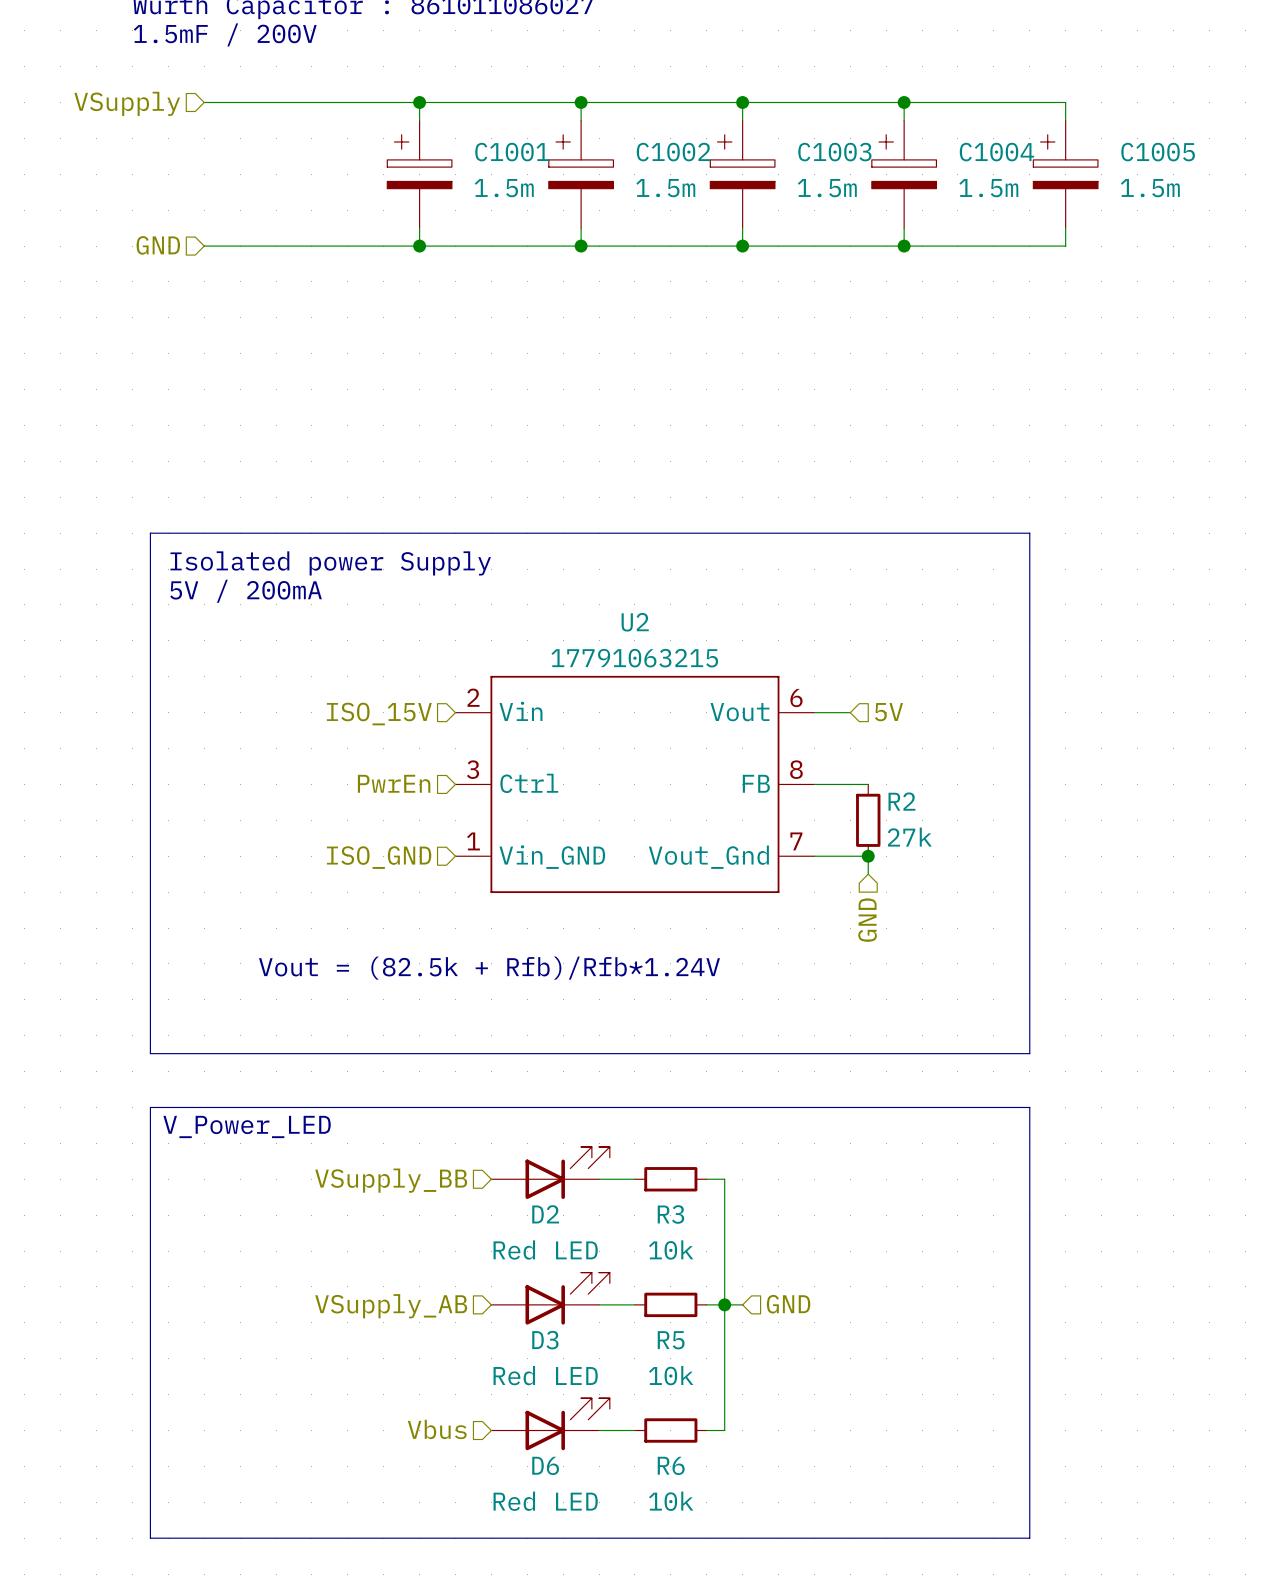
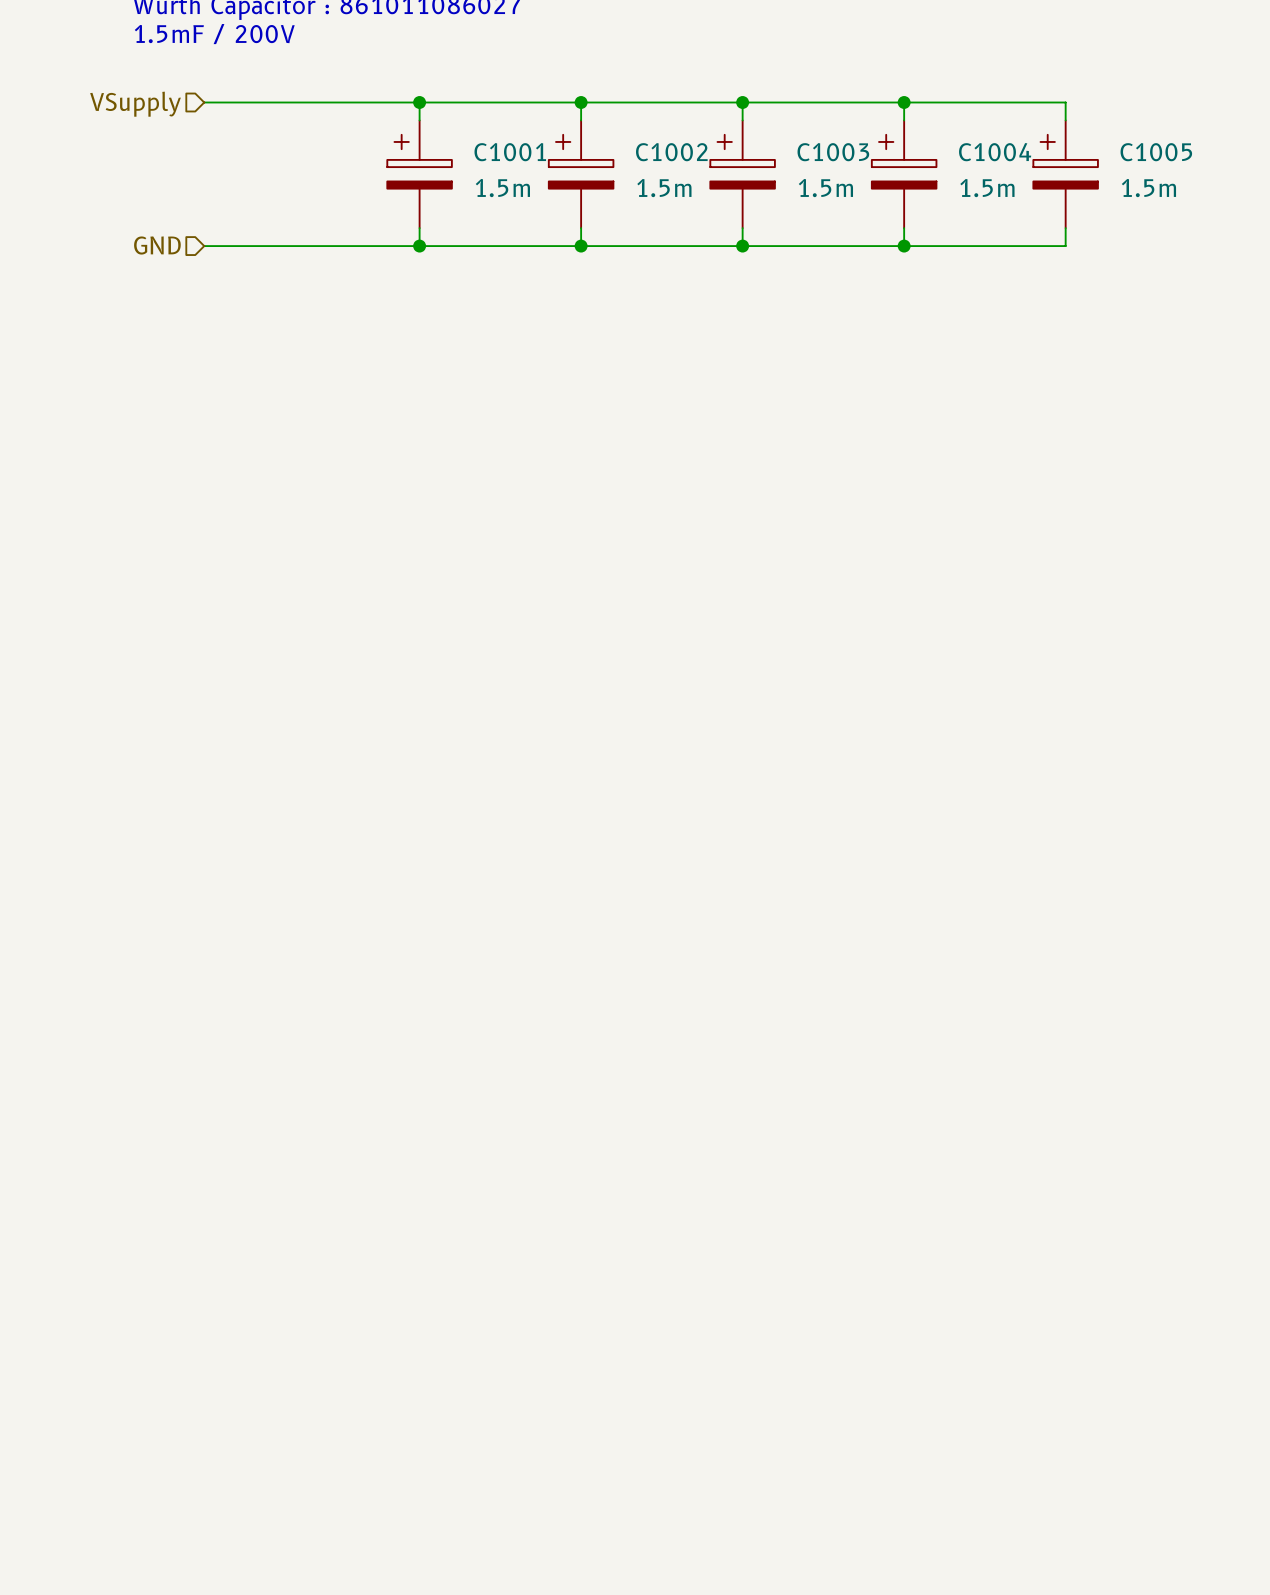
line: (150, 533) (150, 1053) (1029, 1053) (1029, 533) (150, 533) -> none
text: Isolated power Supply (330, 563) -> none
text: 5V / 200mA (246, 591) -> none
wire: (814, 712) (850, 712) -> none
hierarchical label: 5V (889, 712) -> none
hierarchical label: ISO_15V (379, 714) -> none
hierarchical label: PwrEn (394, 783) -> none
U2: 17791063215 (634, 784) -> none
wire: (814, 784) (868, 784) -> none
R2: 27k (868, 820) -> none
wire: (814, 856) (868, 856) (868, 874) -> none
junction: (868, 856) -> none
hierarchical label: ISO_GND (379, 857) -> none
hierarchical label: GND (867, 920) -> none
text: Vout = (82.5k + Rfb)/Rfb*1.24V (489, 968) -> none
line: (150, 1107) (1029, 1107) (1029, 1538) (150, 1538) (150, 1107) -> none
text: V_Power_LED (247, 1126) -> none
D2: Red LED (550, 1172) -> none
wire: (599, 1179) (634, 1179) -> none
R3: 10k (670, 1179) -> none
wire: (706, 1179) (724, 1179) (724, 1430) (706, 1430) -> none
hierarchical label: VSupply_BB (391, 1180) -> none
D3: Red LED (550, 1298) -> none
wire: (599, 1304) (634, 1304) -> none
R5: 10k (670, 1304) -> none
wire: (706, 1304) (742, 1304) -> none
junction: (724, 1304) -> none
hierarchical label: GND (788, 1304) -> none
hierarchical label: VSupply_AB (391, 1306) -> none
D6: Red LED (550, 1424) -> none
hierarchical label: Vbus (437, 1429) -> none
wire: (599, 1430) (634, 1430) -> none
R6: 10k (670, 1430) -> none

